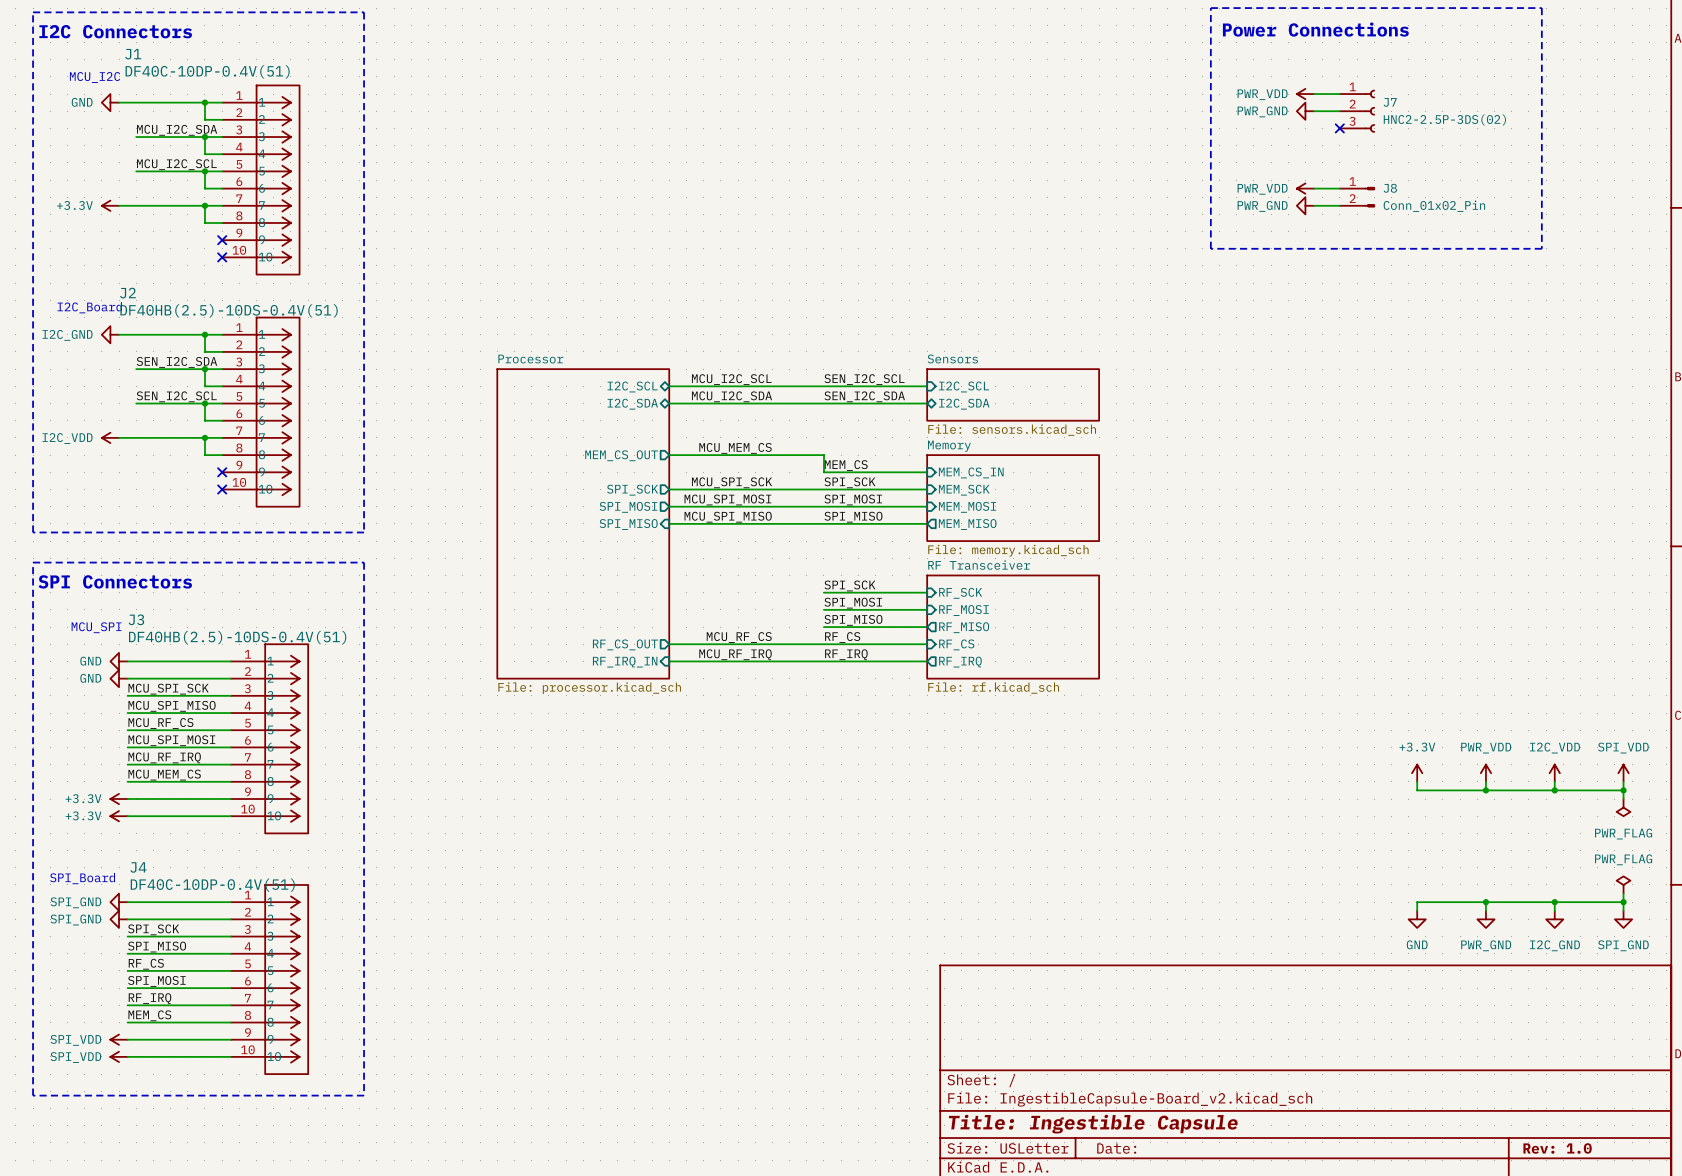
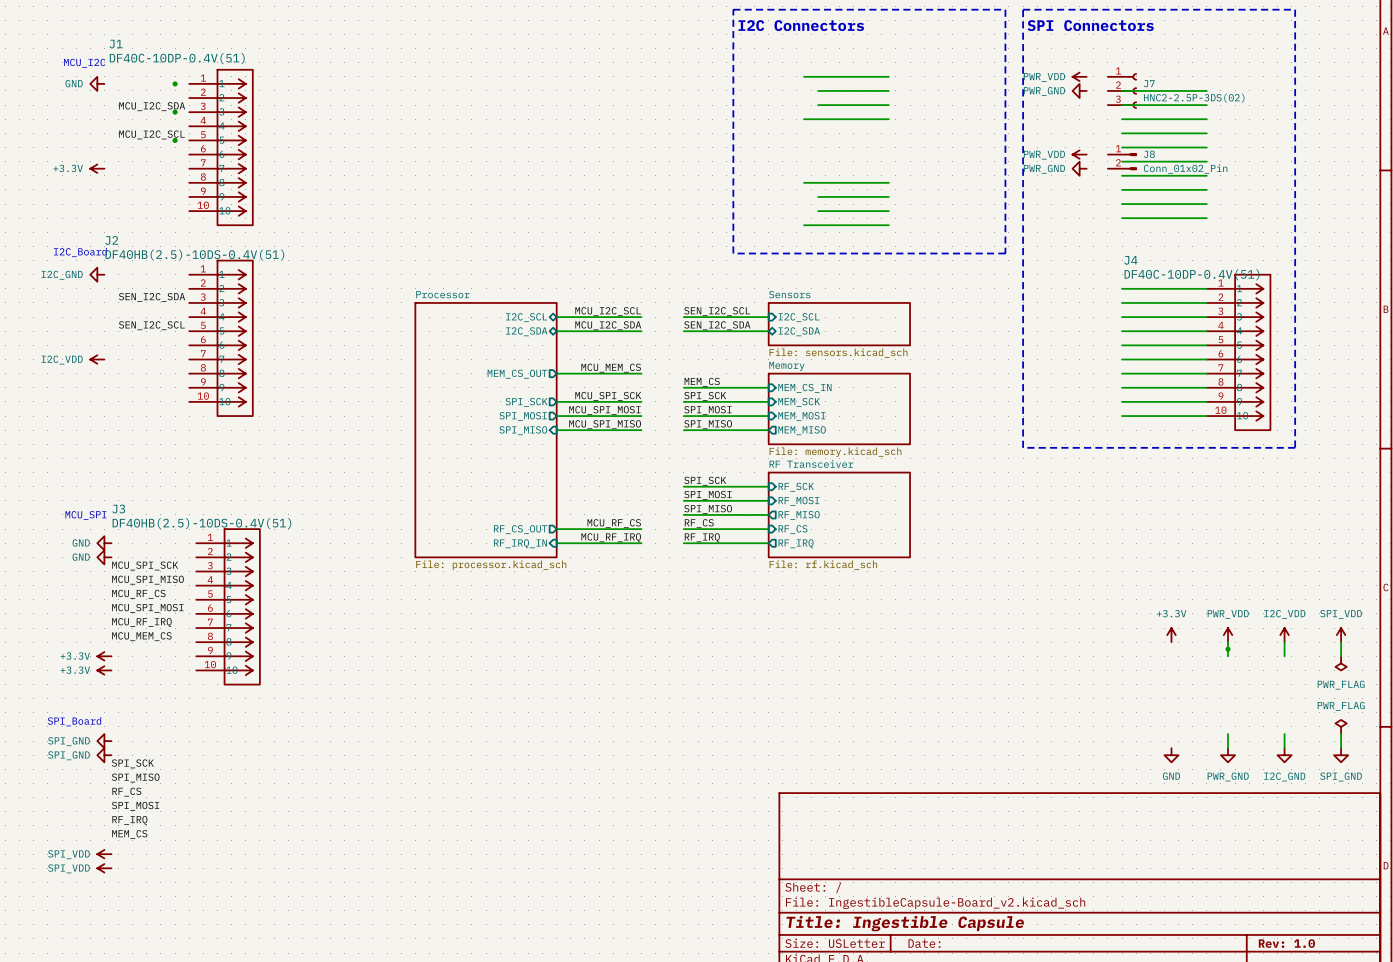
line: (1210, 8) (1541, 8) (1541, 248) (1210, 248) (1210, 8) -> none
line: (33, 12) (364, 12) (364, 532) (33, 532) (33, 12) -> none
line: none -> (733, 9) (1005, 9) (1005, 253) (733, 253) (733, 9)
line: none -> (1023, 9) (1295, 9) (1295, 447) (1023, 447) (1023, 9)
text: Power Connections (1315, 29) -> SPI Connectors (1090, 25)
text: I2C Connectors (115, 31) -> none
text: none -> I2C Connectors (801, 25)
wire: none -> (804, 76) (888, 76)
wire: (1314, 94) (1339, 94) -> none
wire: (119, 102) (222, 102) -> none
wire: (204, 102) (204, 119) (222, 119) -> none
wire: none -> (818, 90) (888, 90)
wire: (1314, 111) (1339, 111) -> none
wire: none -> (1122, 90) (1206, 90)
wire: none -> (818, 105) (888, 105)
no-connect mark: (1339, 128) -> none
wire: none -> (1122, 105) (1206, 105)
wire: (136, 137) (222, 137) -> none
wire: (204, 137) (204, 154) (222, 154) -> none
wire: none -> (804, 119) (888, 119)
wire: none -> (1122, 119) (1206, 119)
wire: none -> (1122, 133) (1206, 133)
wire: (136, 171) (222, 171) -> none
wire: (204, 171) (204, 188) (222, 188) -> none
wire: none -> (1122, 147) (1206, 147)
wire: (1314, 188) (1339, 188) -> none
wire: none -> (1122, 161) (1206, 161)
wire: (119, 205) (222, 205) -> none
wire: (204, 205) (204, 222) (222, 222) -> none
junction: (204, 205) -> none
wire: (1314, 205) (1339, 205) -> none
wire: none -> (1122, 175) (1206, 175)
wire: none -> (804, 182) (888, 182)
wire: none -> (1122, 189) (1206, 189)
no-connect mark: (222, 240) -> none
wire: none -> (818, 196) (888, 196)
no-connect mark: (222, 257) -> none
wire: none -> (818, 211) (888, 211)
wire: none -> (1122, 218) (1206, 218)
wire: none -> (804, 225) (888, 225)
wire: (119, 334) (222, 334) -> none
wire: (204, 334) (204, 351) (222, 351) -> none
junction: (204, 334) -> none
wire: none -> (1122, 288) (1206, 288)
wire: (136, 369) (222, 369) -> none
wire: (204, 369) (204, 386) (222, 386) -> none
junction: (204, 369) -> none
wire: none -> (1122, 302) (1206, 302)
wire: (772, 386) (823, 386) -> none
wire: none -> (1122, 317) (1206, 317)
wire: (136, 403) (222, 403) -> none
wire: (204, 403) (204, 420) (222, 420) -> none
junction: (204, 403) -> none
wire: (772, 403) (823, 403) -> none
wire: none -> (1122, 331) (1206, 331)
wire: none -> (1122, 345) (1206, 345)
wire: (119, 437) (222, 437) -> none
wire: (204, 437) (204, 455) (222, 455) -> none
junction: (204, 437) -> none
wire: none -> (1122, 359) (1206, 359)
wire: (772, 455) (823, 455) (823, 472) -> none
wire: none -> (1122, 373) (1206, 373)
no-connect mark: (222, 472) -> none
wire: none -> (1122, 387) (1206, 387)
no-connect mark: (222, 489) -> none
wire: (772, 489) (823, 489) -> none
wire: none -> (1122, 401) (1206, 401)
wire: (772, 506) (823, 506) -> none
wire: none -> (1122, 416) (1206, 416)
wire: (772, 523) (823, 523) -> none
line: (33, 562) (33, 1095) (364, 1095) (364, 562) (33, 562) -> none
text: SPI Connectors (115, 581) -> none
wire: (772, 644) (823, 644) -> none
wire: (127, 661) (230, 661) -> none
wire: (772, 661) (823, 661) -> none
wire: (127, 678) (230, 678) -> none
wire: (127, 695) (230, 695) -> none
wire: (127, 713) (230, 713) -> none
wire: (127, 730) (230, 730) -> none
wire: (127, 747) (230, 747) -> none
wire: (127, 764) (230, 764) -> none
wire: (127, 781) (230, 781) -> none
wire: (1417, 781) (1417, 790) (1623, 790) -> none
wire: none -> (1228, 649) (1228, 656)
wire: none -> (1284, 649) (1284, 656)
junction: (1554, 790) -> none
junction: (1623, 790) -> none
wire: (127, 799) (230, 799) -> none
wire: (127, 816) (230, 816) -> none
wire: none -> (1228, 734) (1228, 741)
wire: none -> (1284, 734) (1284, 741)
wire: (127, 902) (230, 902) -> none
junction: (1485, 902) -> none
junction: (1554, 902) -> none
wire: (1623, 902) (1417, 902) (1417, 910) -> none
junction: (1623, 902) -> none
wire: (127, 919) (230, 919) -> none
wire: (127, 936) (230, 936) -> none
wire: (127, 953) (230, 953) -> none
wire: (127, 970) (230, 970) -> none
J4 position: (269, 979) -> (1238, 352)
wire: (127, 988) (230, 988) -> none
wire: (127, 1005) (230, 1005) -> none
wire: (127, 1022) (230, 1022) -> none
wire: (127, 1039) (230, 1039) -> none
wire: (127, 1056) (230, 1056) -> none

